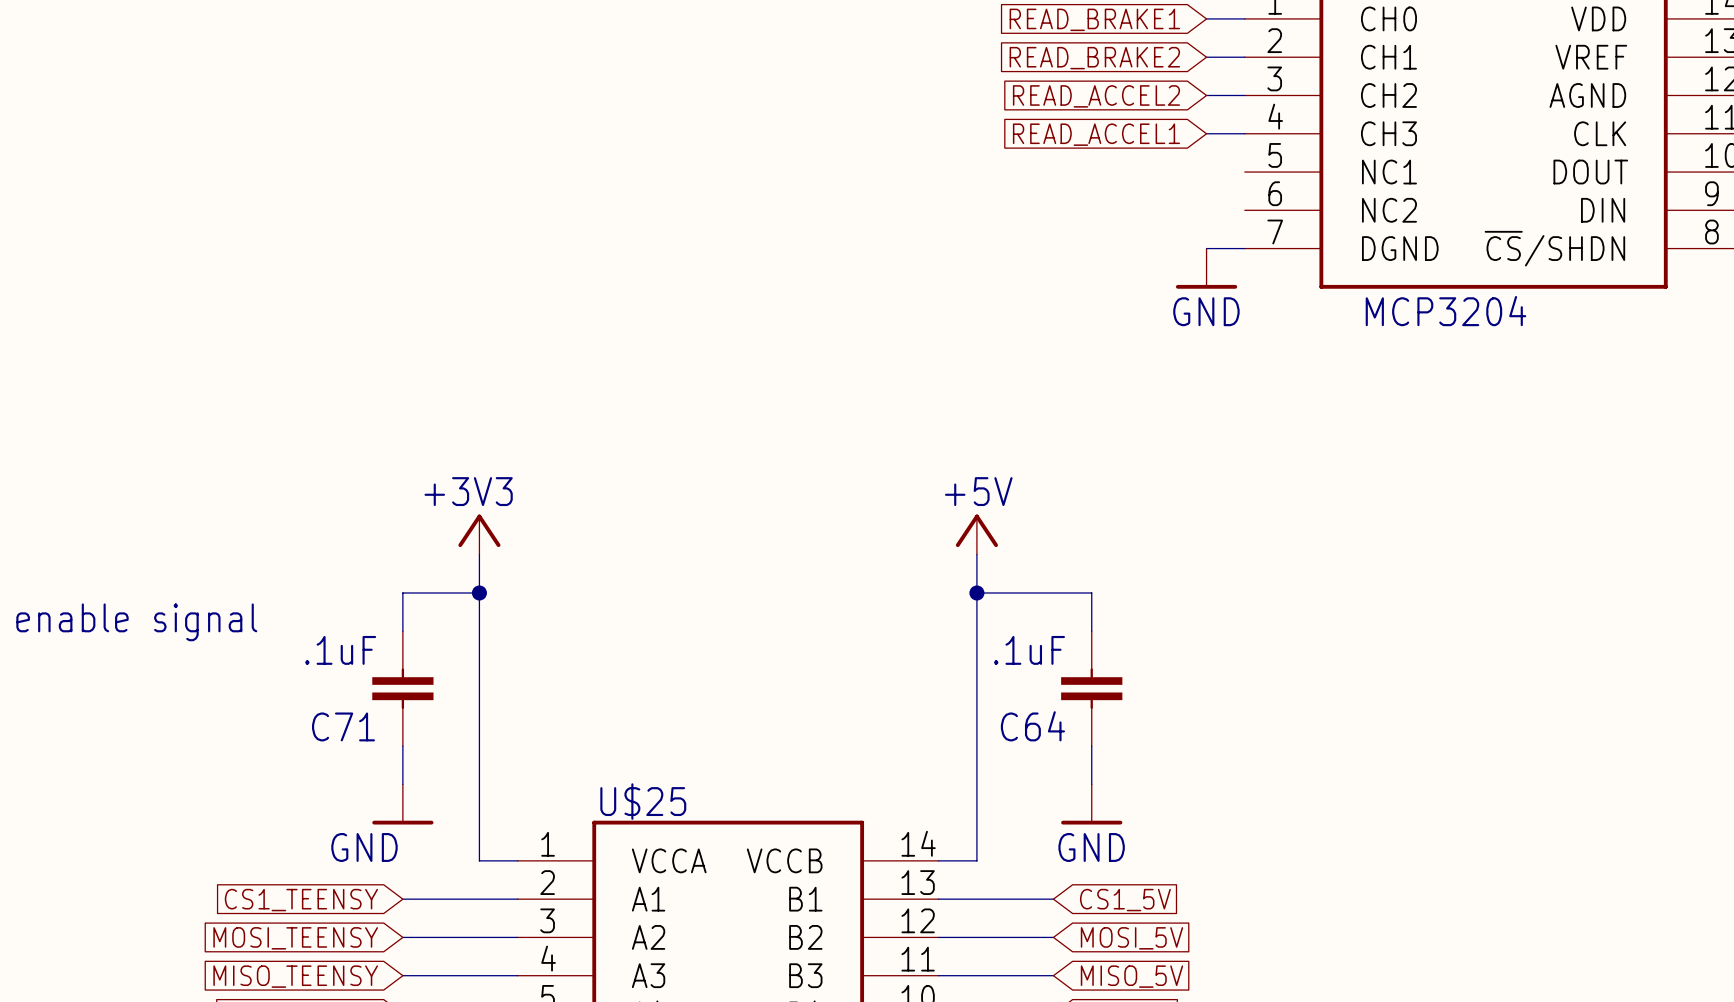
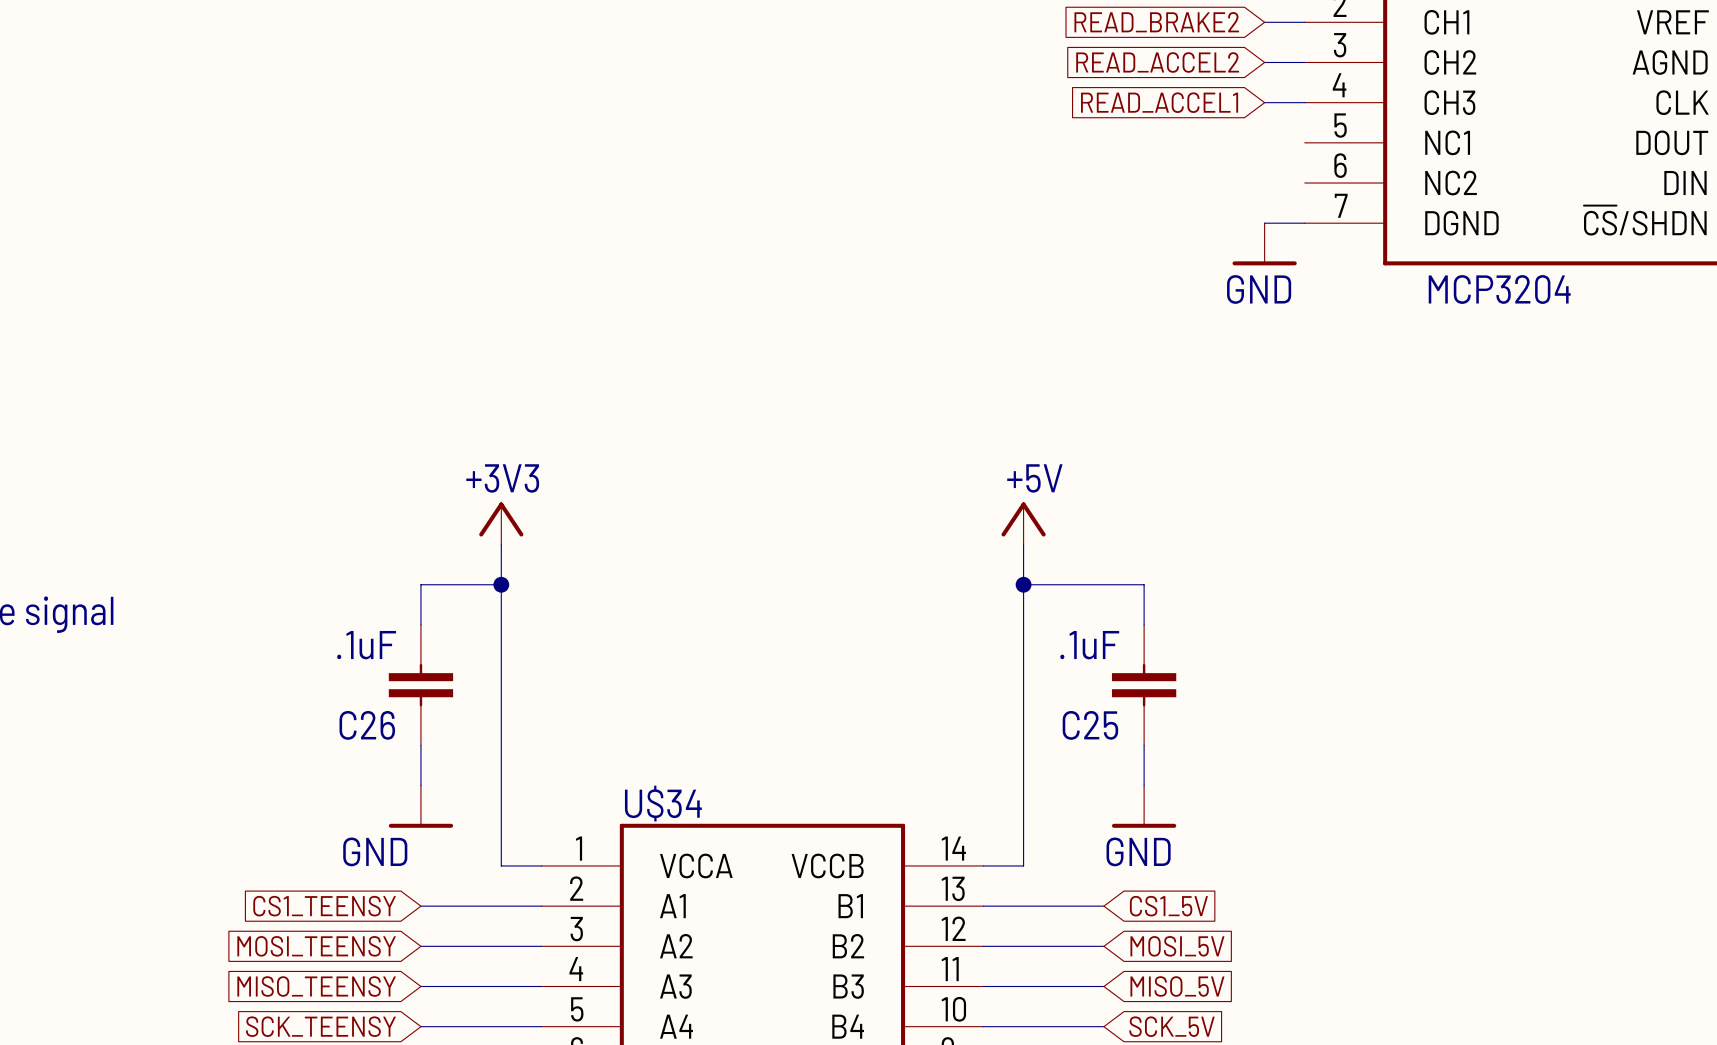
C71 name: C71 (343, 726) -> C26 (367, 725)
C64 name: C64 (1032, 726) -> C25 (1090, 725)
U$25 name: U$25 (643, 801) -> U$34 (663, 803)

